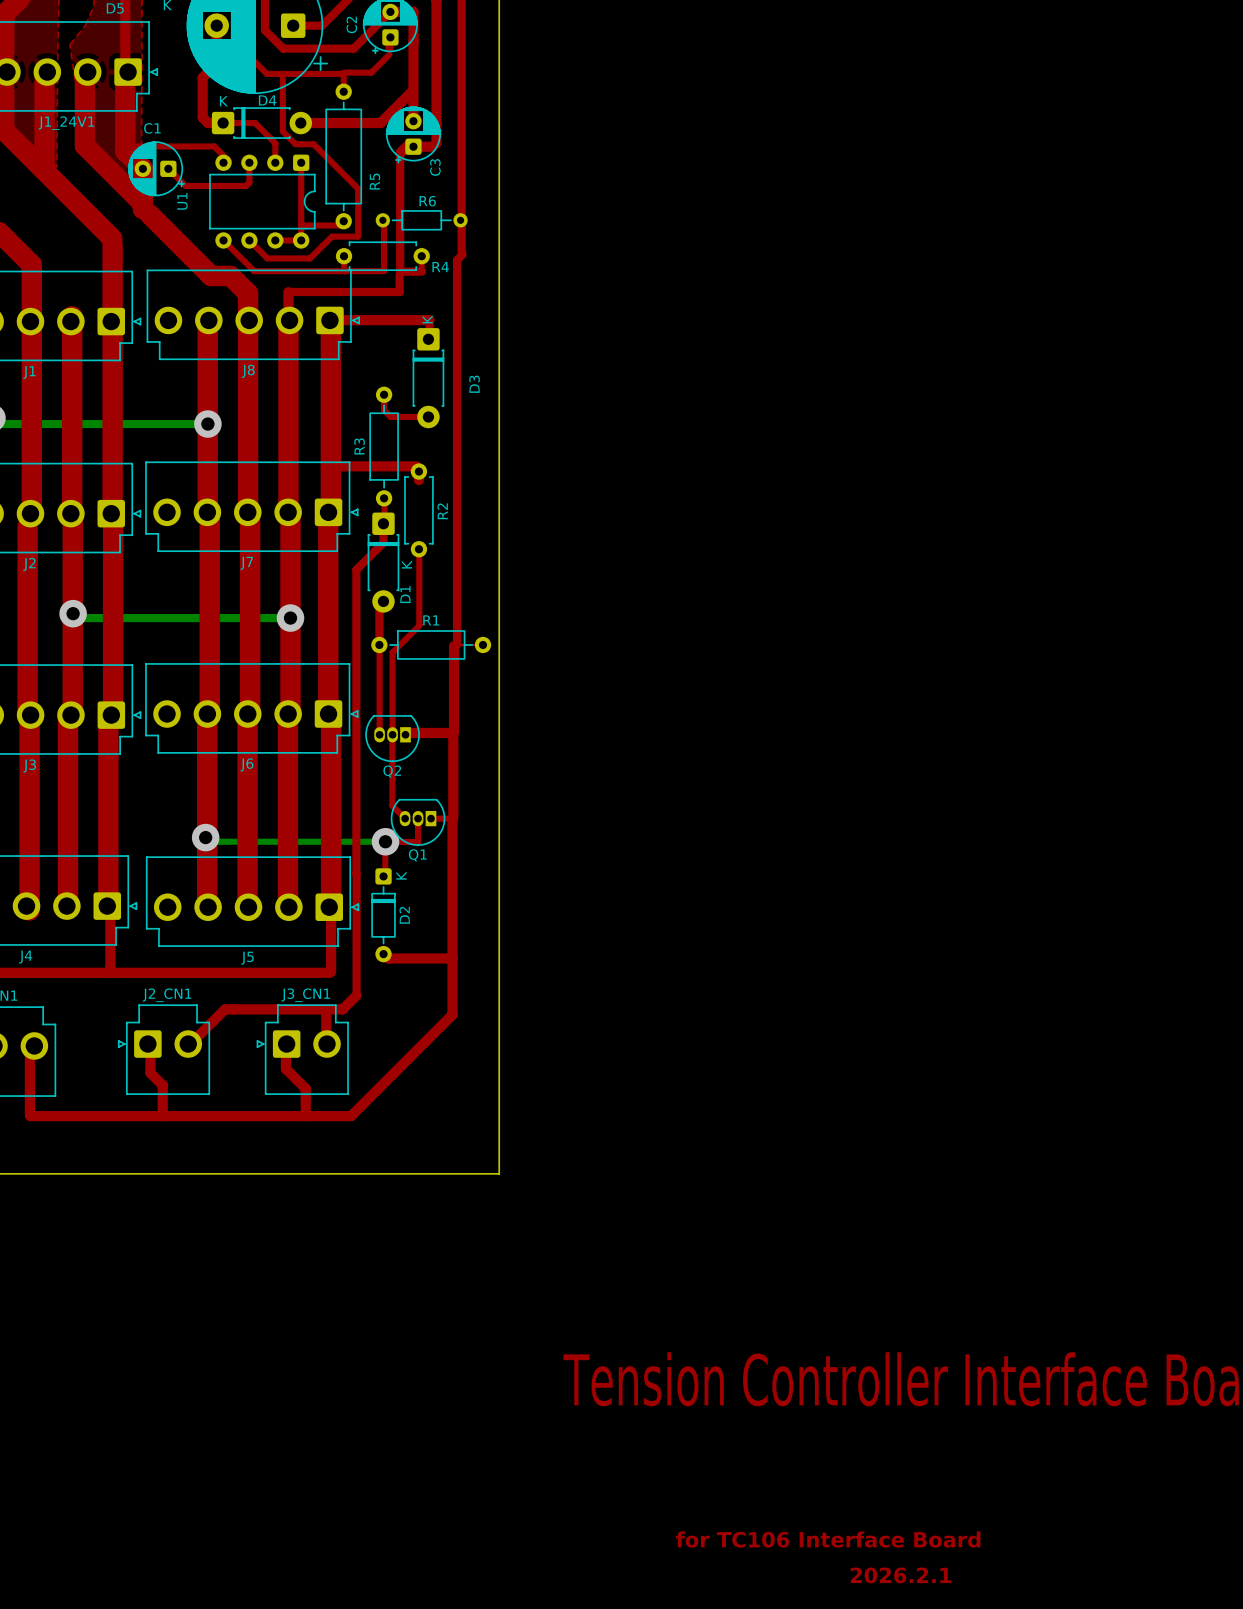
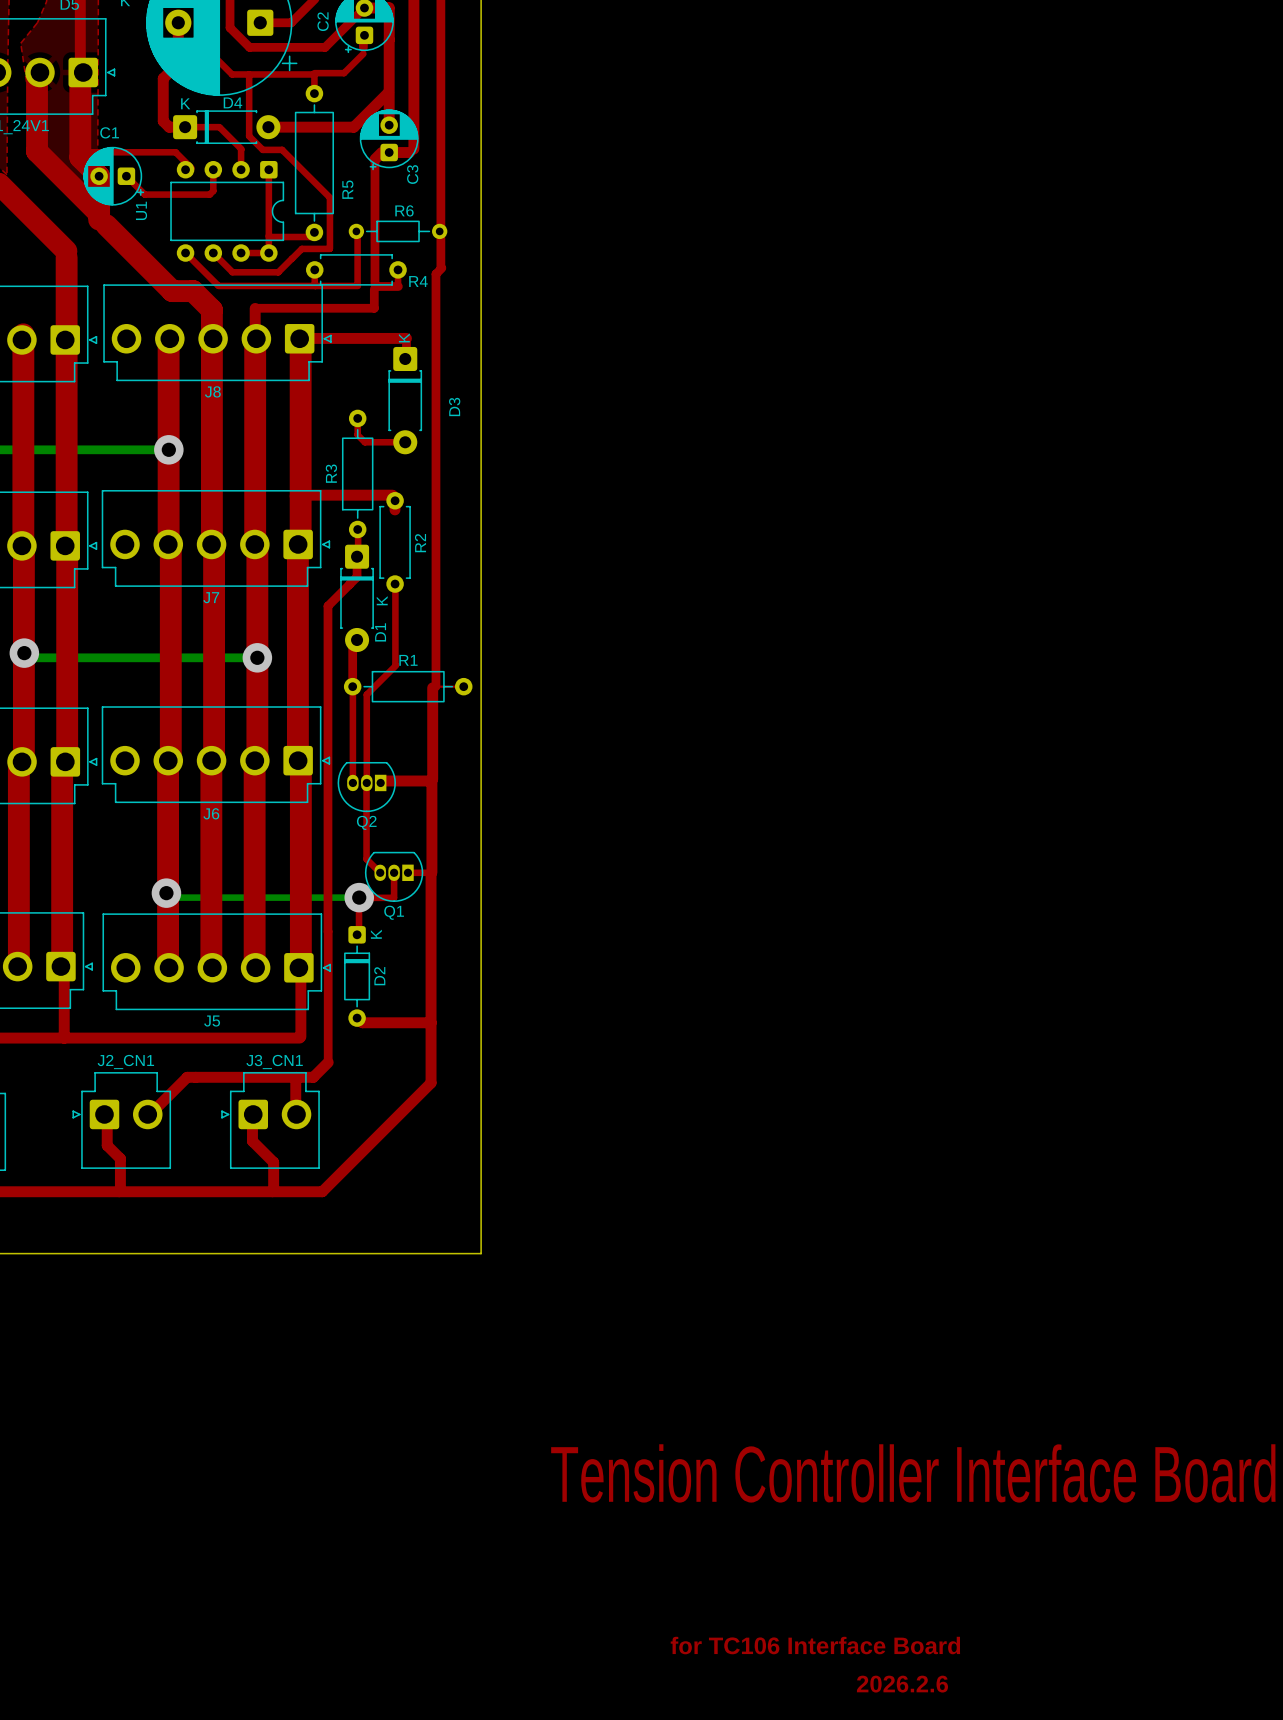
text: 2026.2.1 (900, 1575) -> 2026.2.6 (902, 1684)

